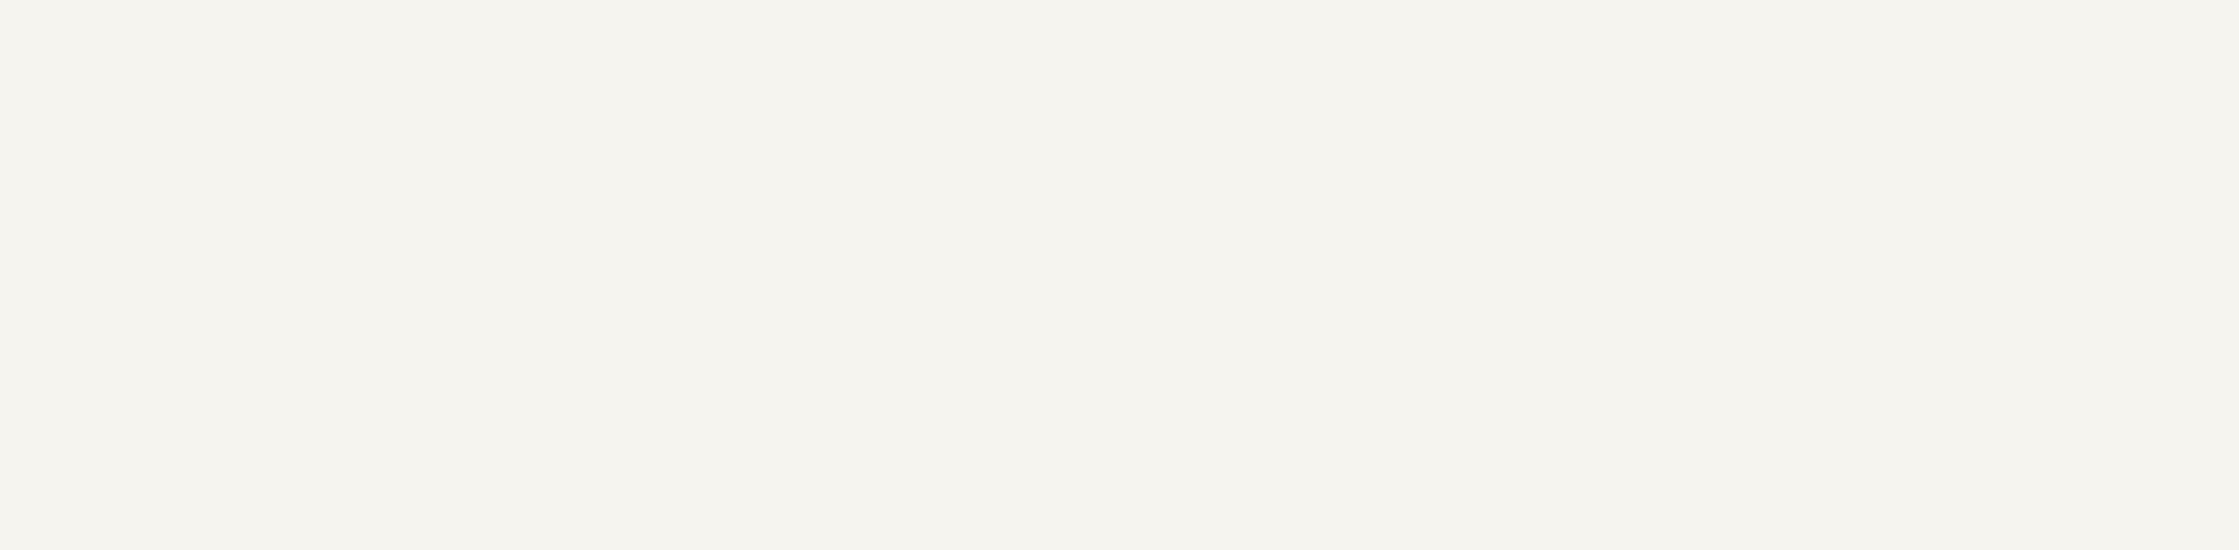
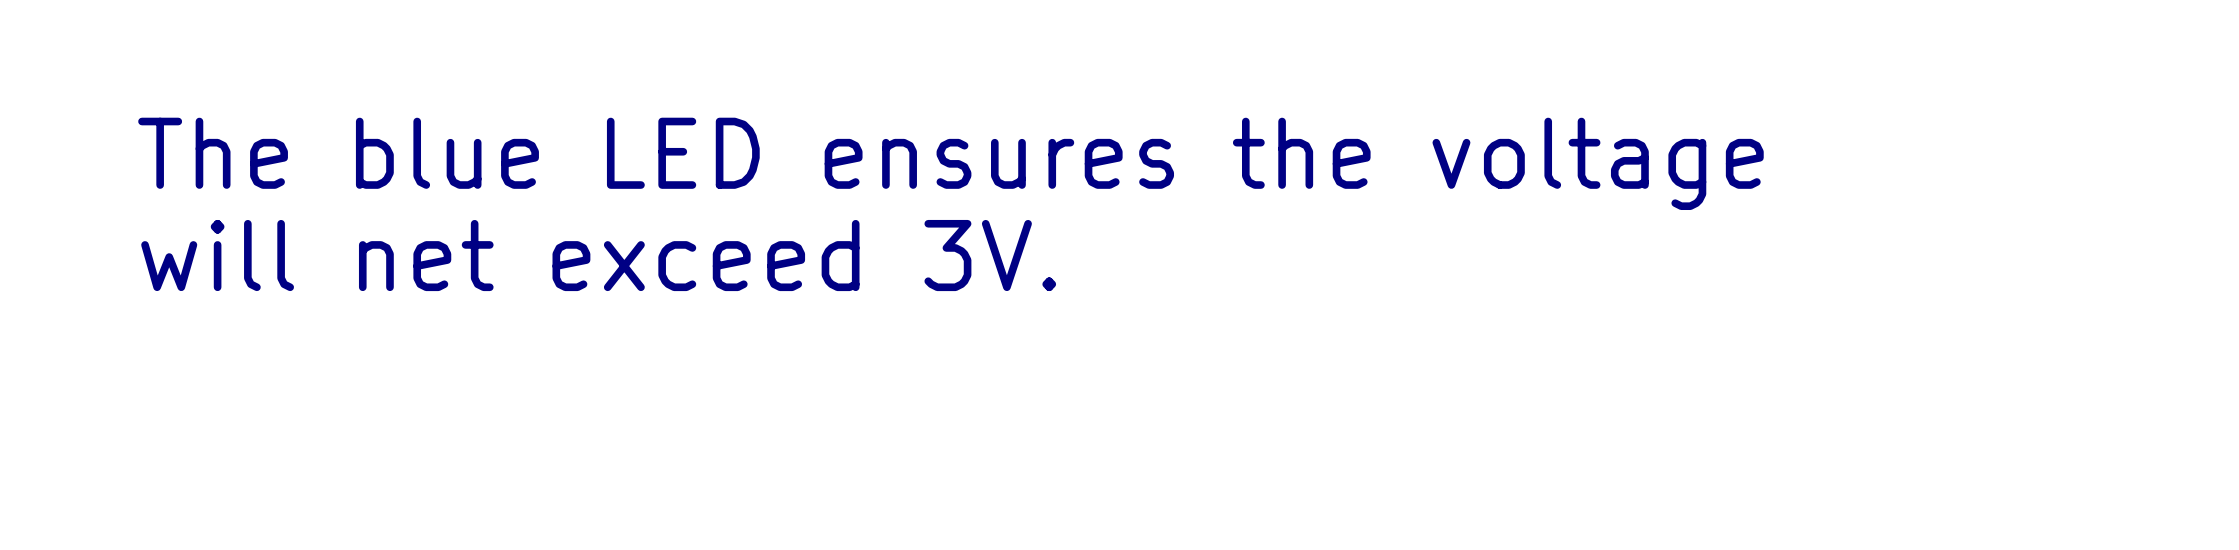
text: none -> The blue LED ensures the voltage (950, 163)
text: none -> will net exceed 3V. (598, 255)

